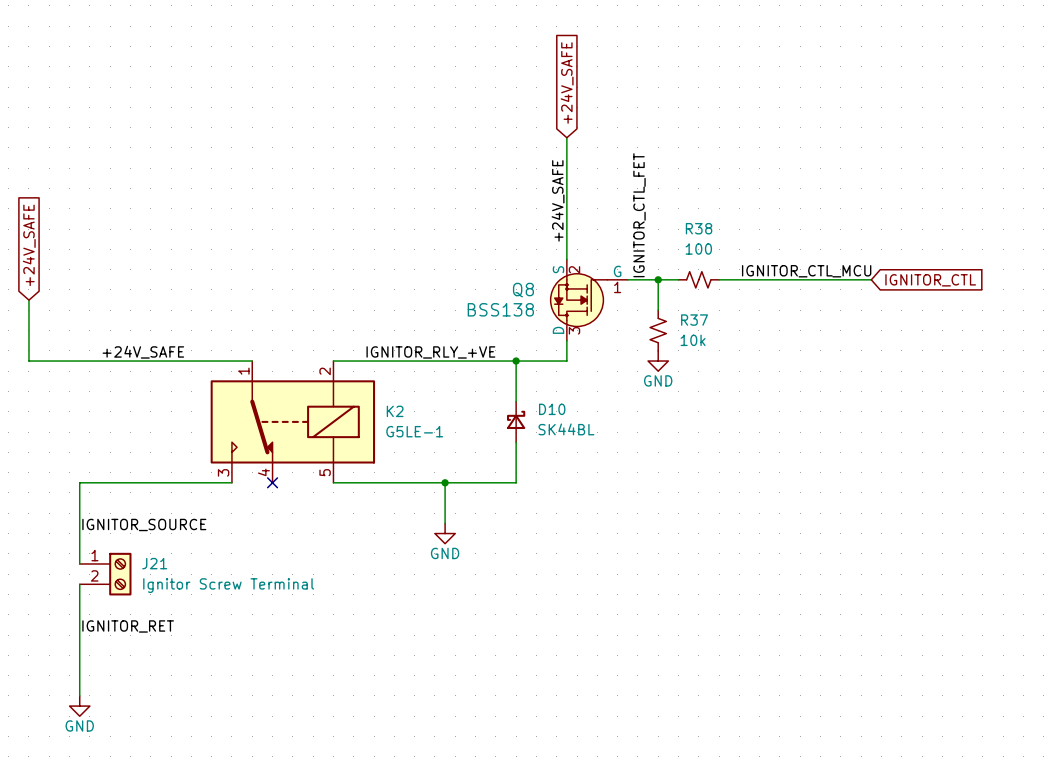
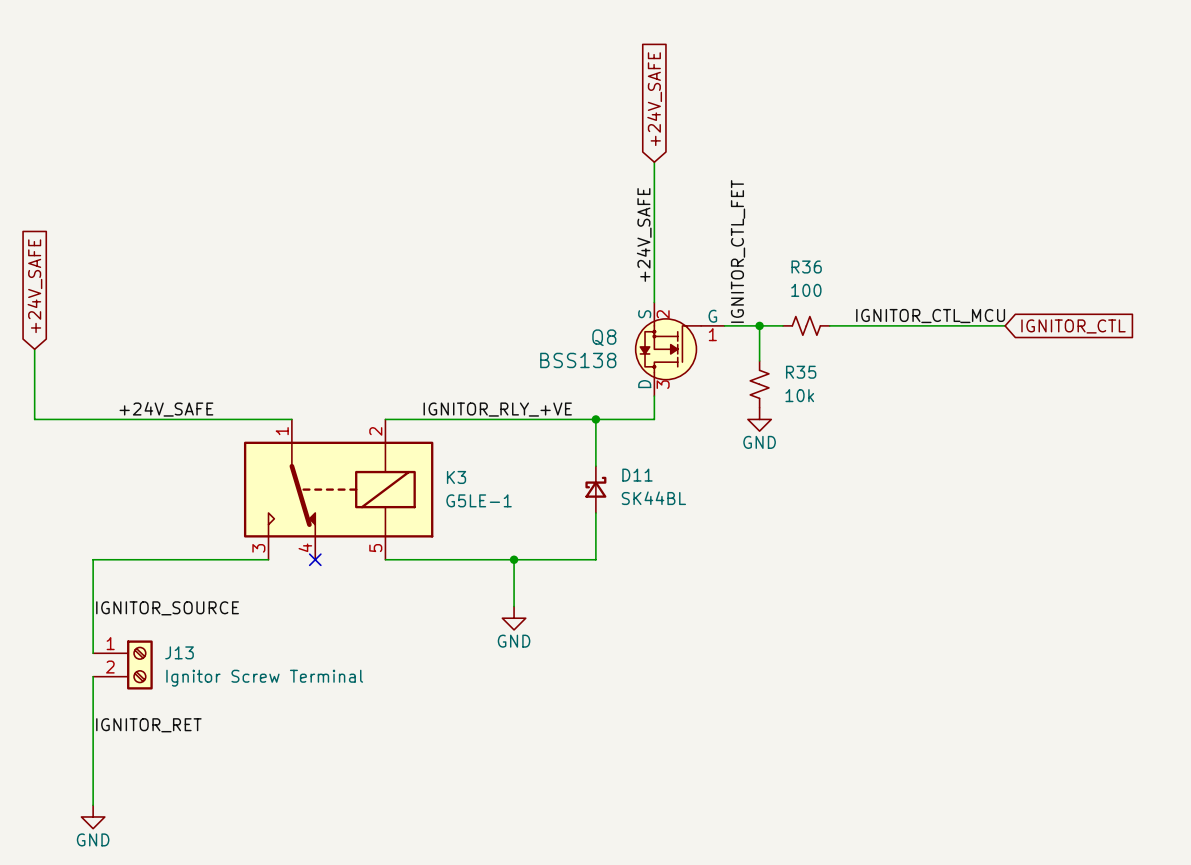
R38 name: R38 (699, 228) -> R36 (806, 267)
R37 name: R37 (694, 320) -> R35 (801, 372)
D10 name: D10 (552, 409) -> D11 (637, 475)
K2 name: K2 (395, 411) -> K3 (456, 477)
J21 name: J21 (154, 563) -> J13 (179, 652)

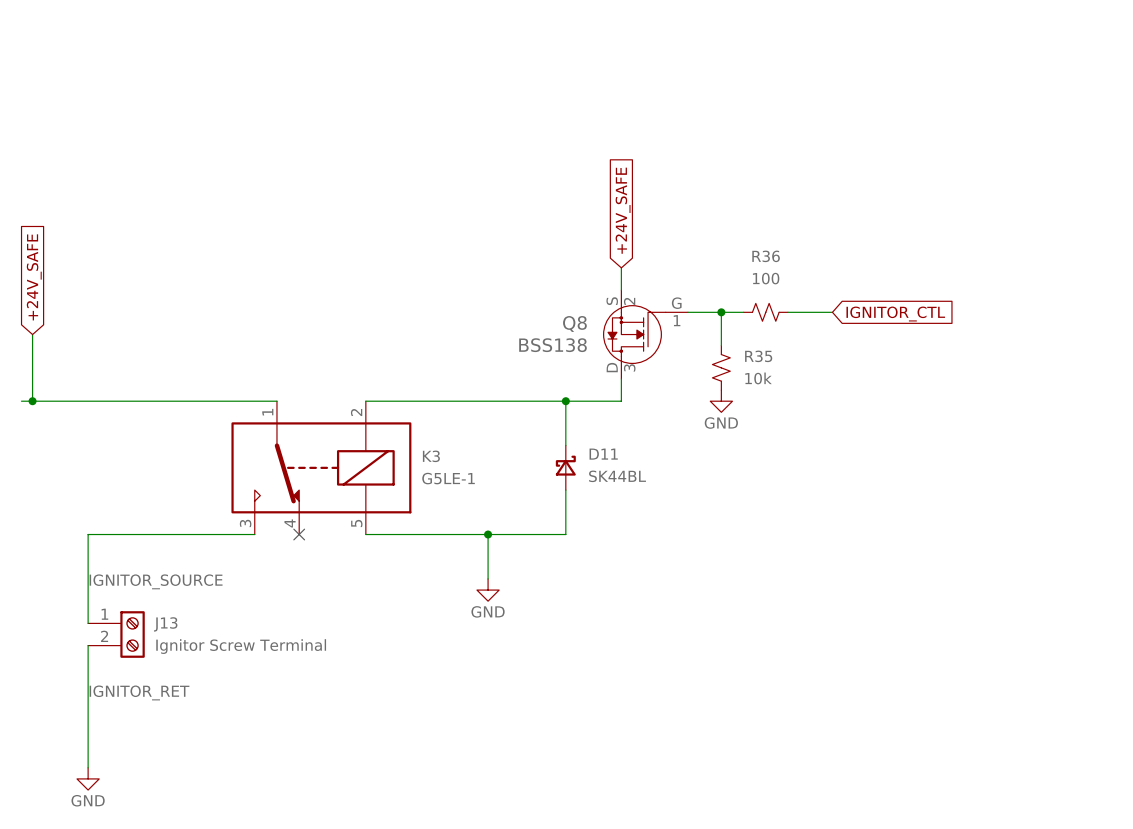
global label position: +24V_SAFE (654, 99) -> +24V_SAFE (623, 210)
wire: (654, 162) (654, 279) -> none
label: +24V_SAFE (644, 234) -> none
label: IGNITOR_CTL_FET (738, 251) -> none
label: IGNITOR_CTL_MCU (930, 316) -> none
wire: (876, 325) (1005, 325) -> none
global label position: IGNITOR_CTL (1073, 326) -> IGNITOR_CTL (895, 314)
label: +24V_SAFE (166, 409) -> none
label: IGNITOR_RLY_+VE (497, 409) -> none
wire: none -> (21, 401) (32, 401)
junction: none -> (32, 401)

